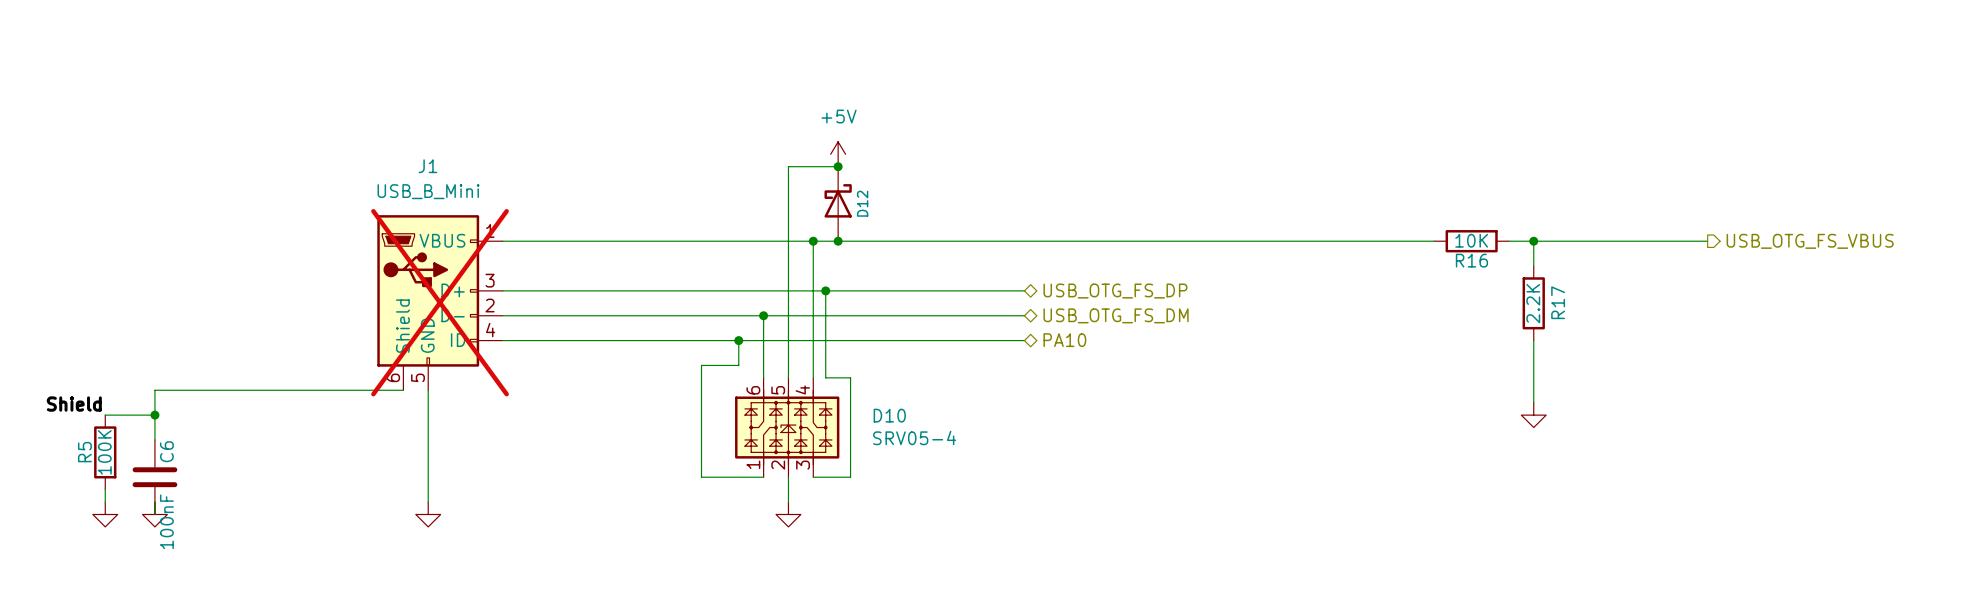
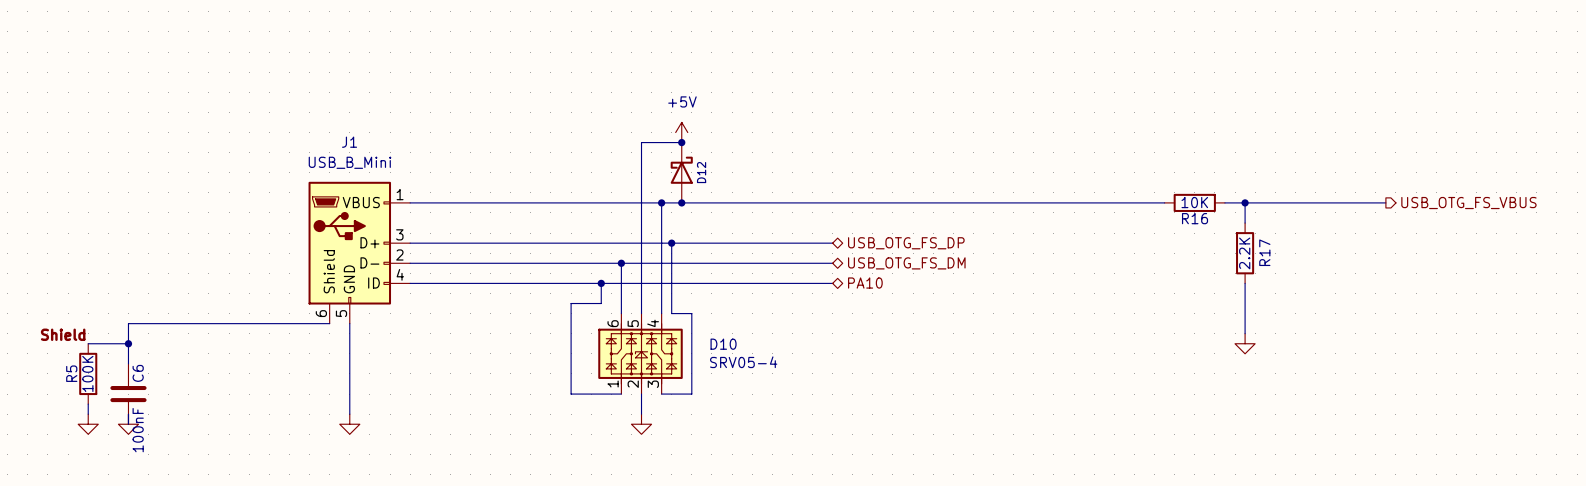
J1 do-not-place cross: (440, 302) -> none

